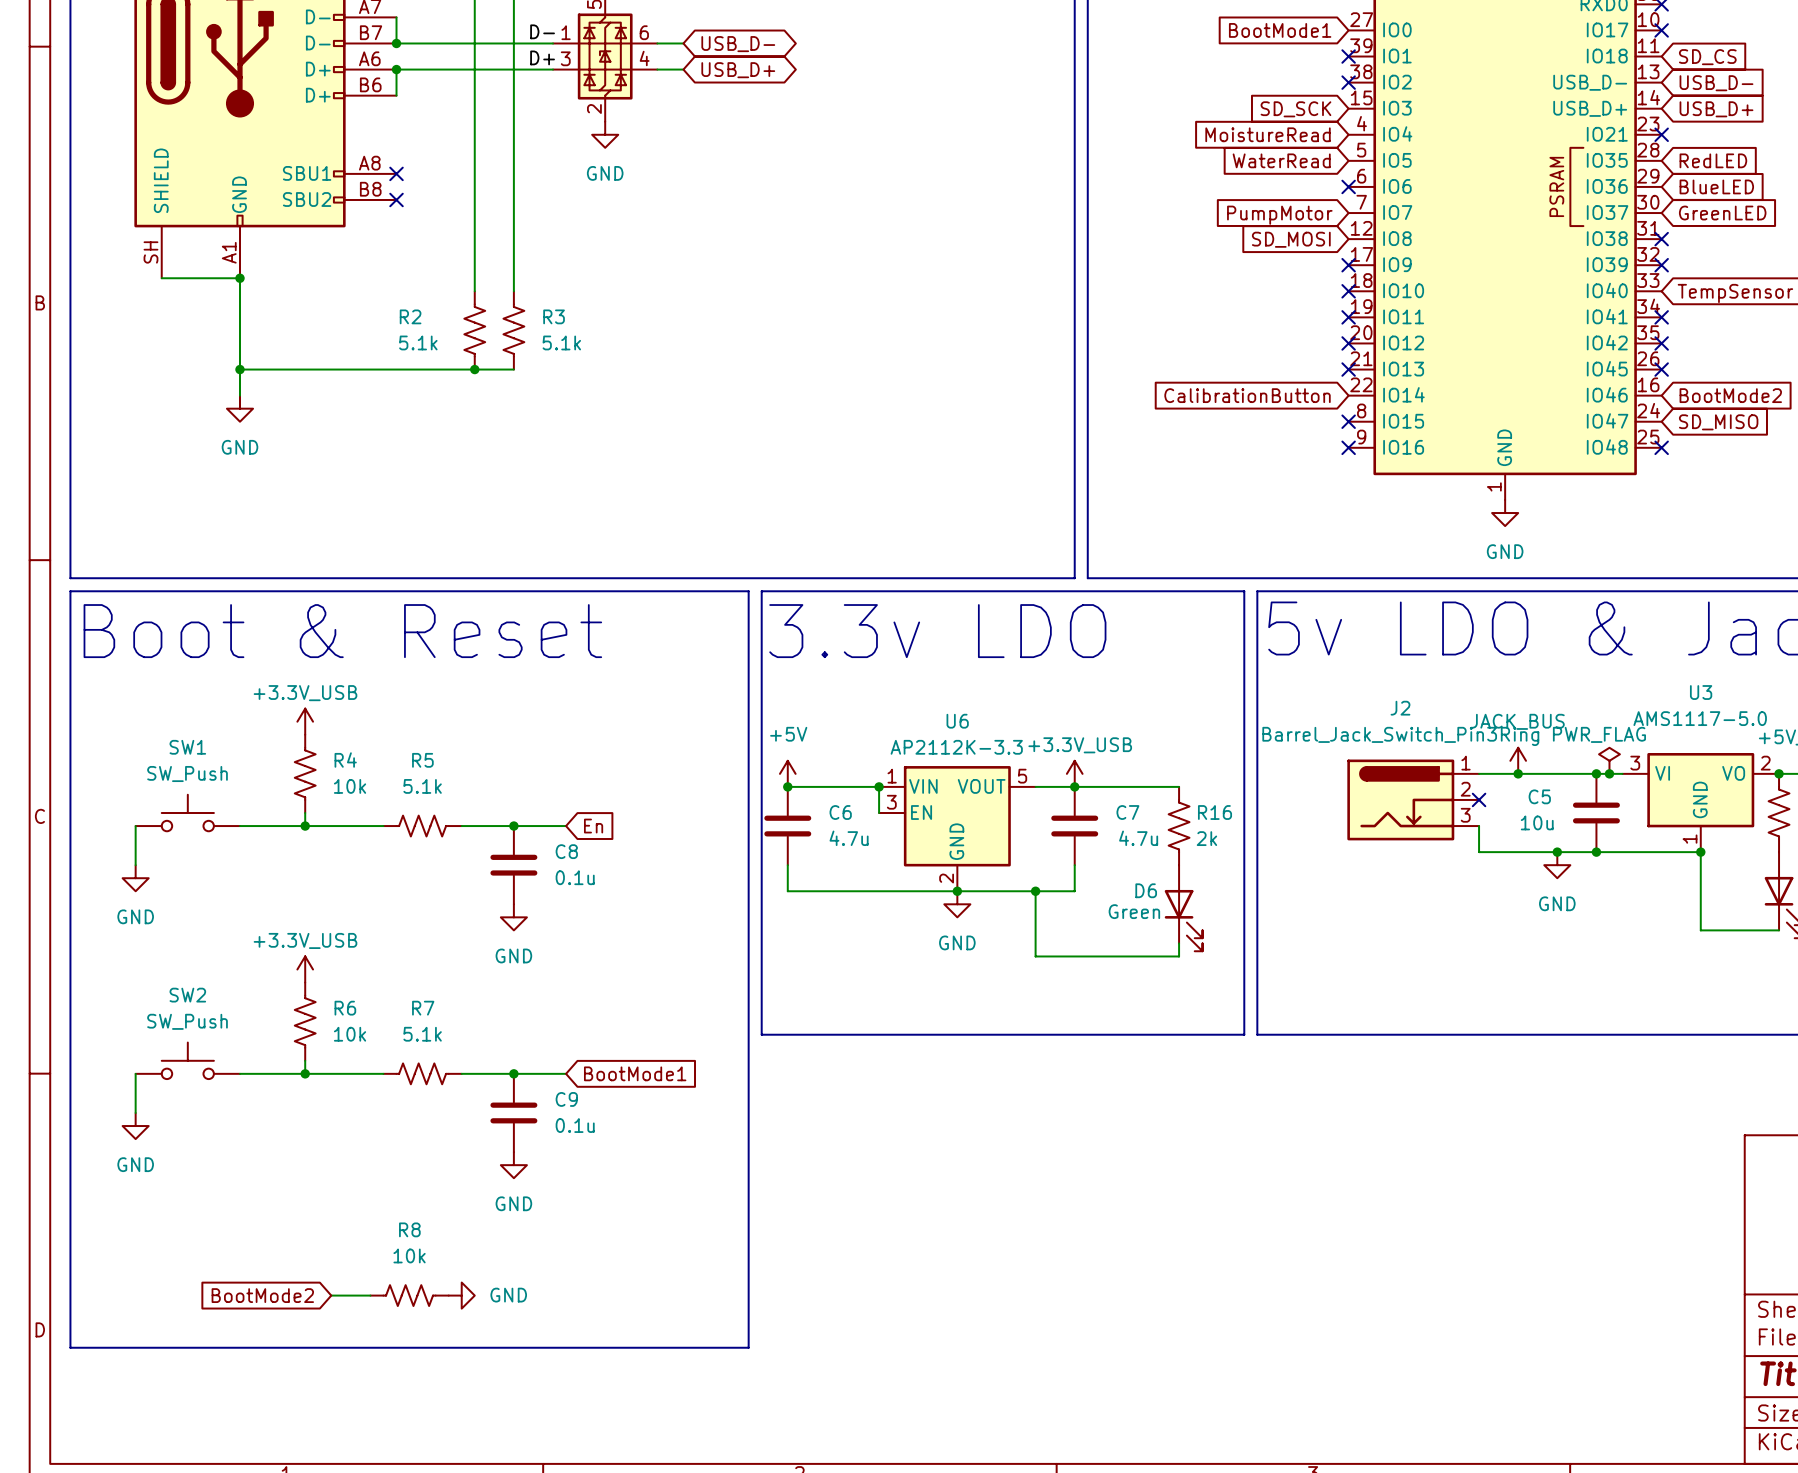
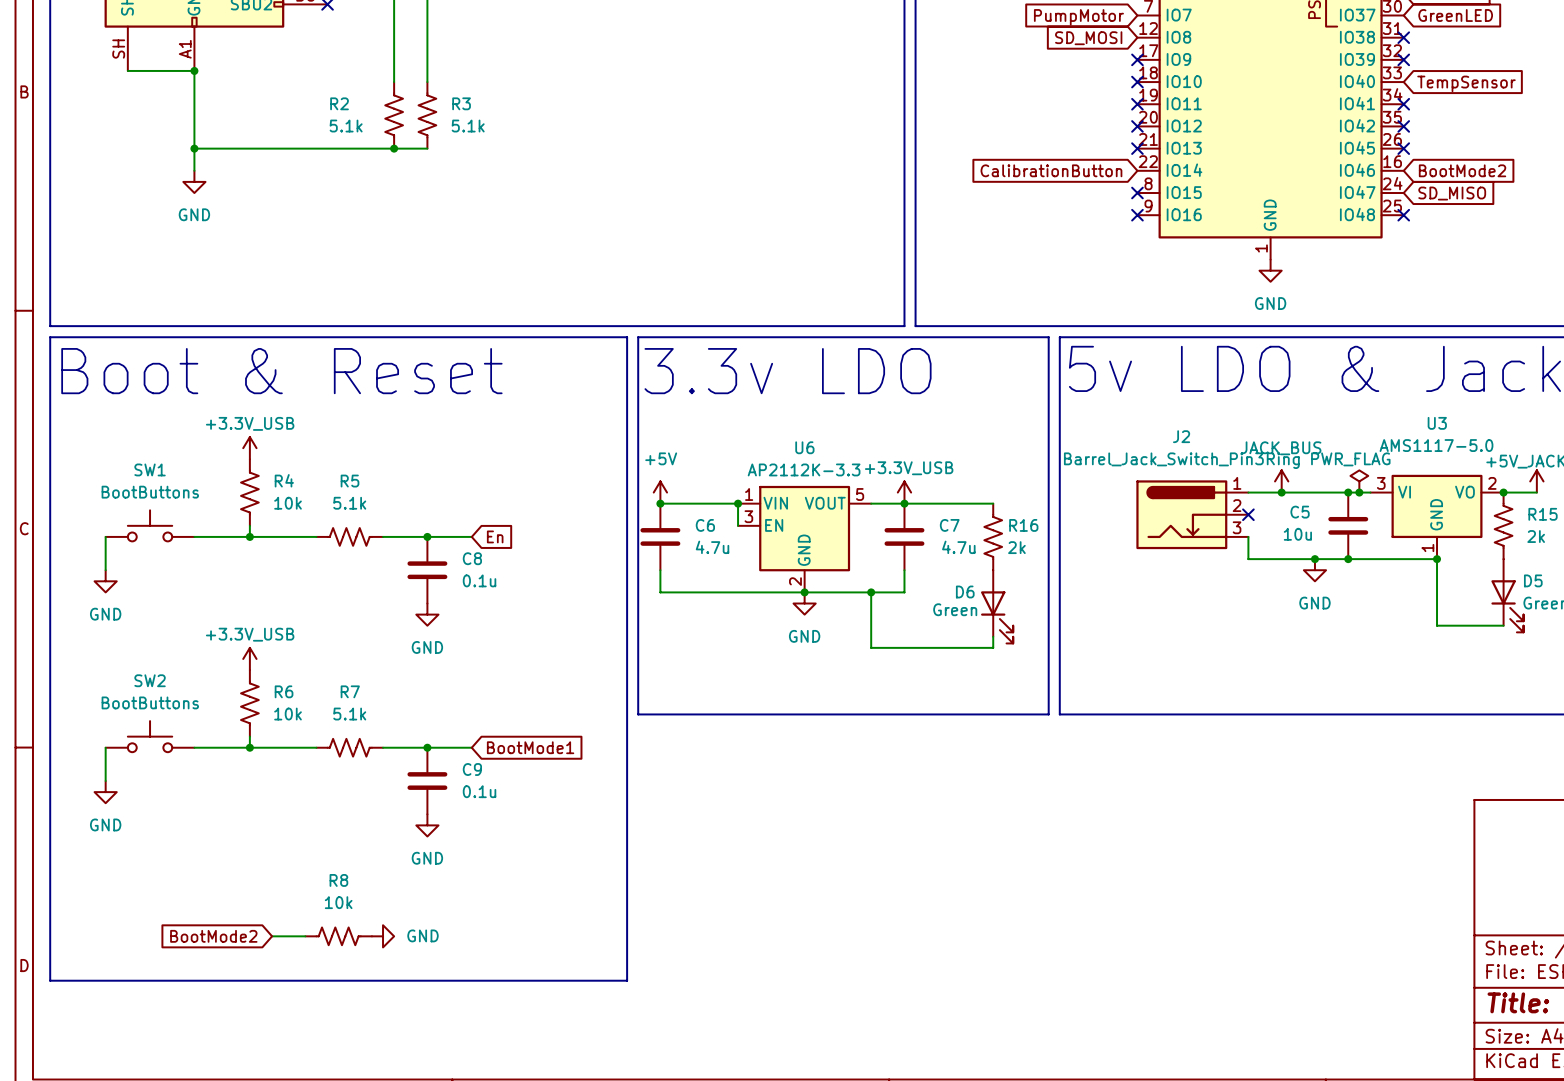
SW1 value: SW_Push (187, 774) -> BootButtons (150, 492)
SW2 value: SW_Push (187, 1021) -> BootButtons (150, 702)

